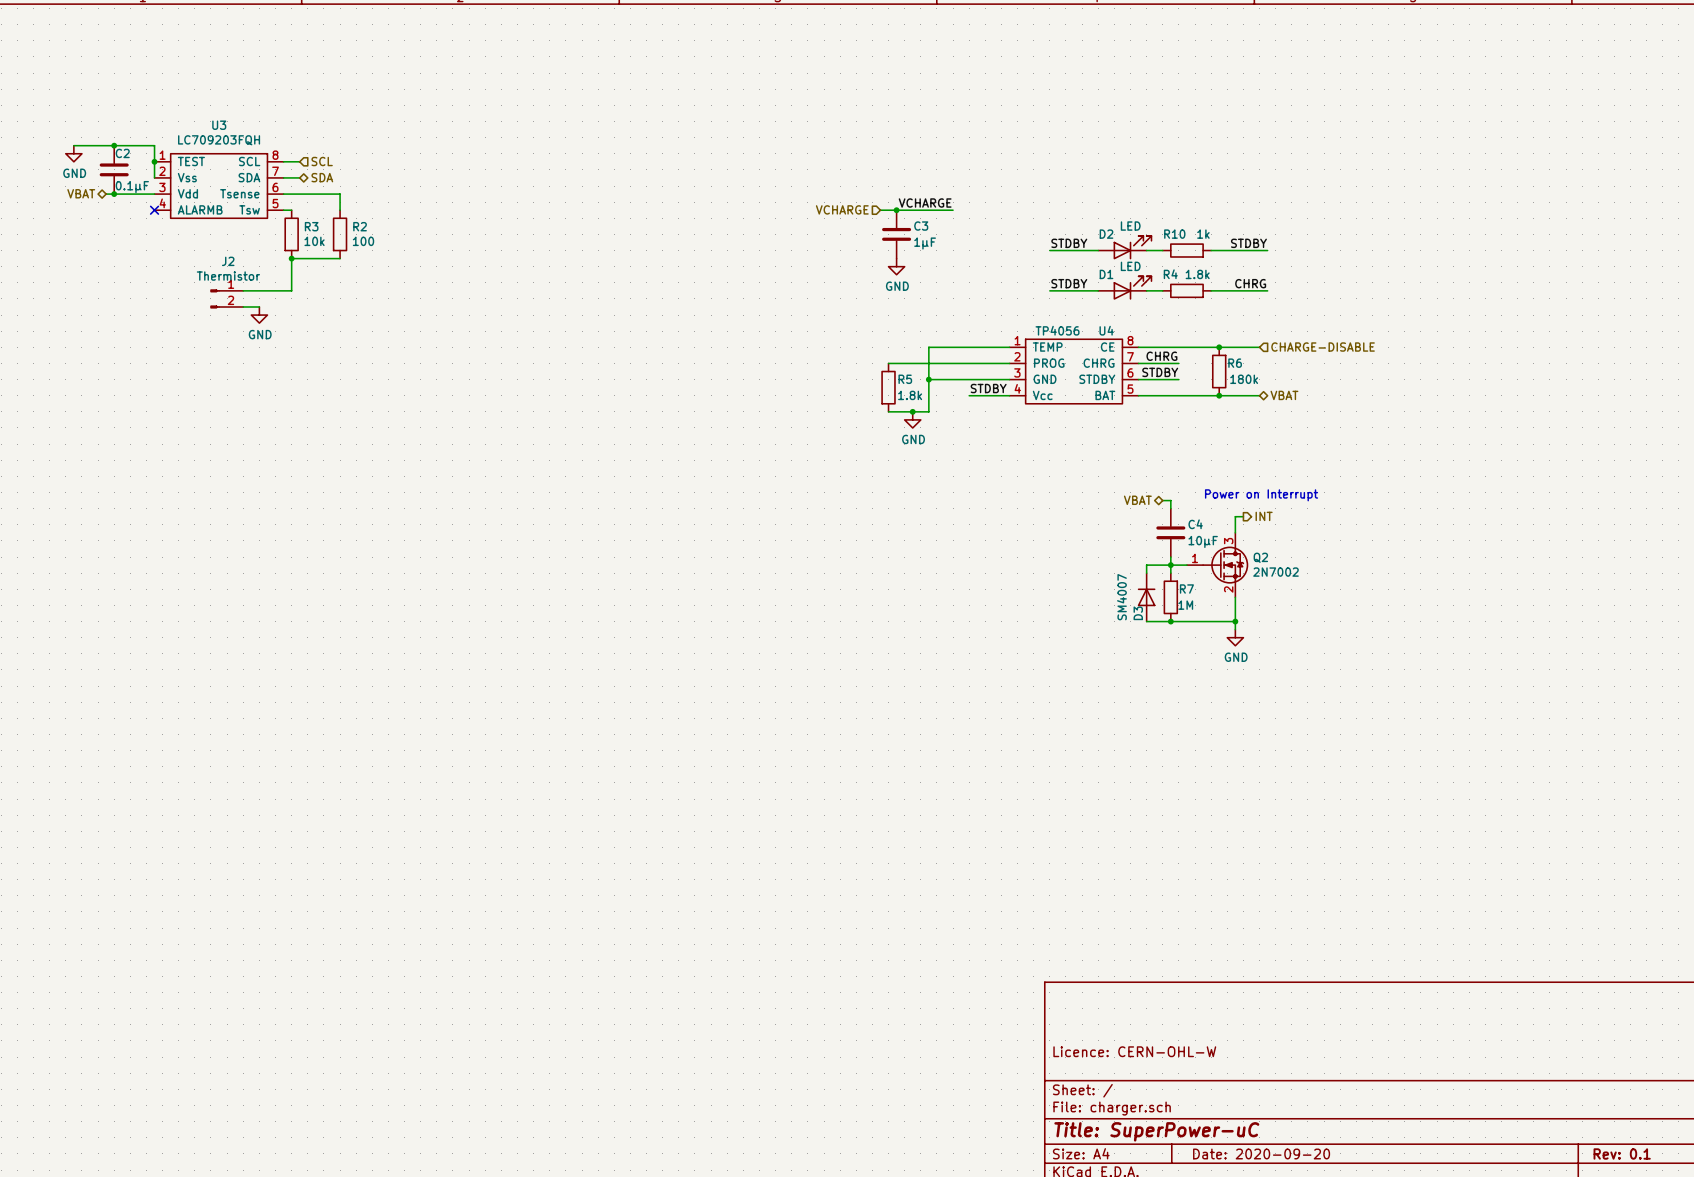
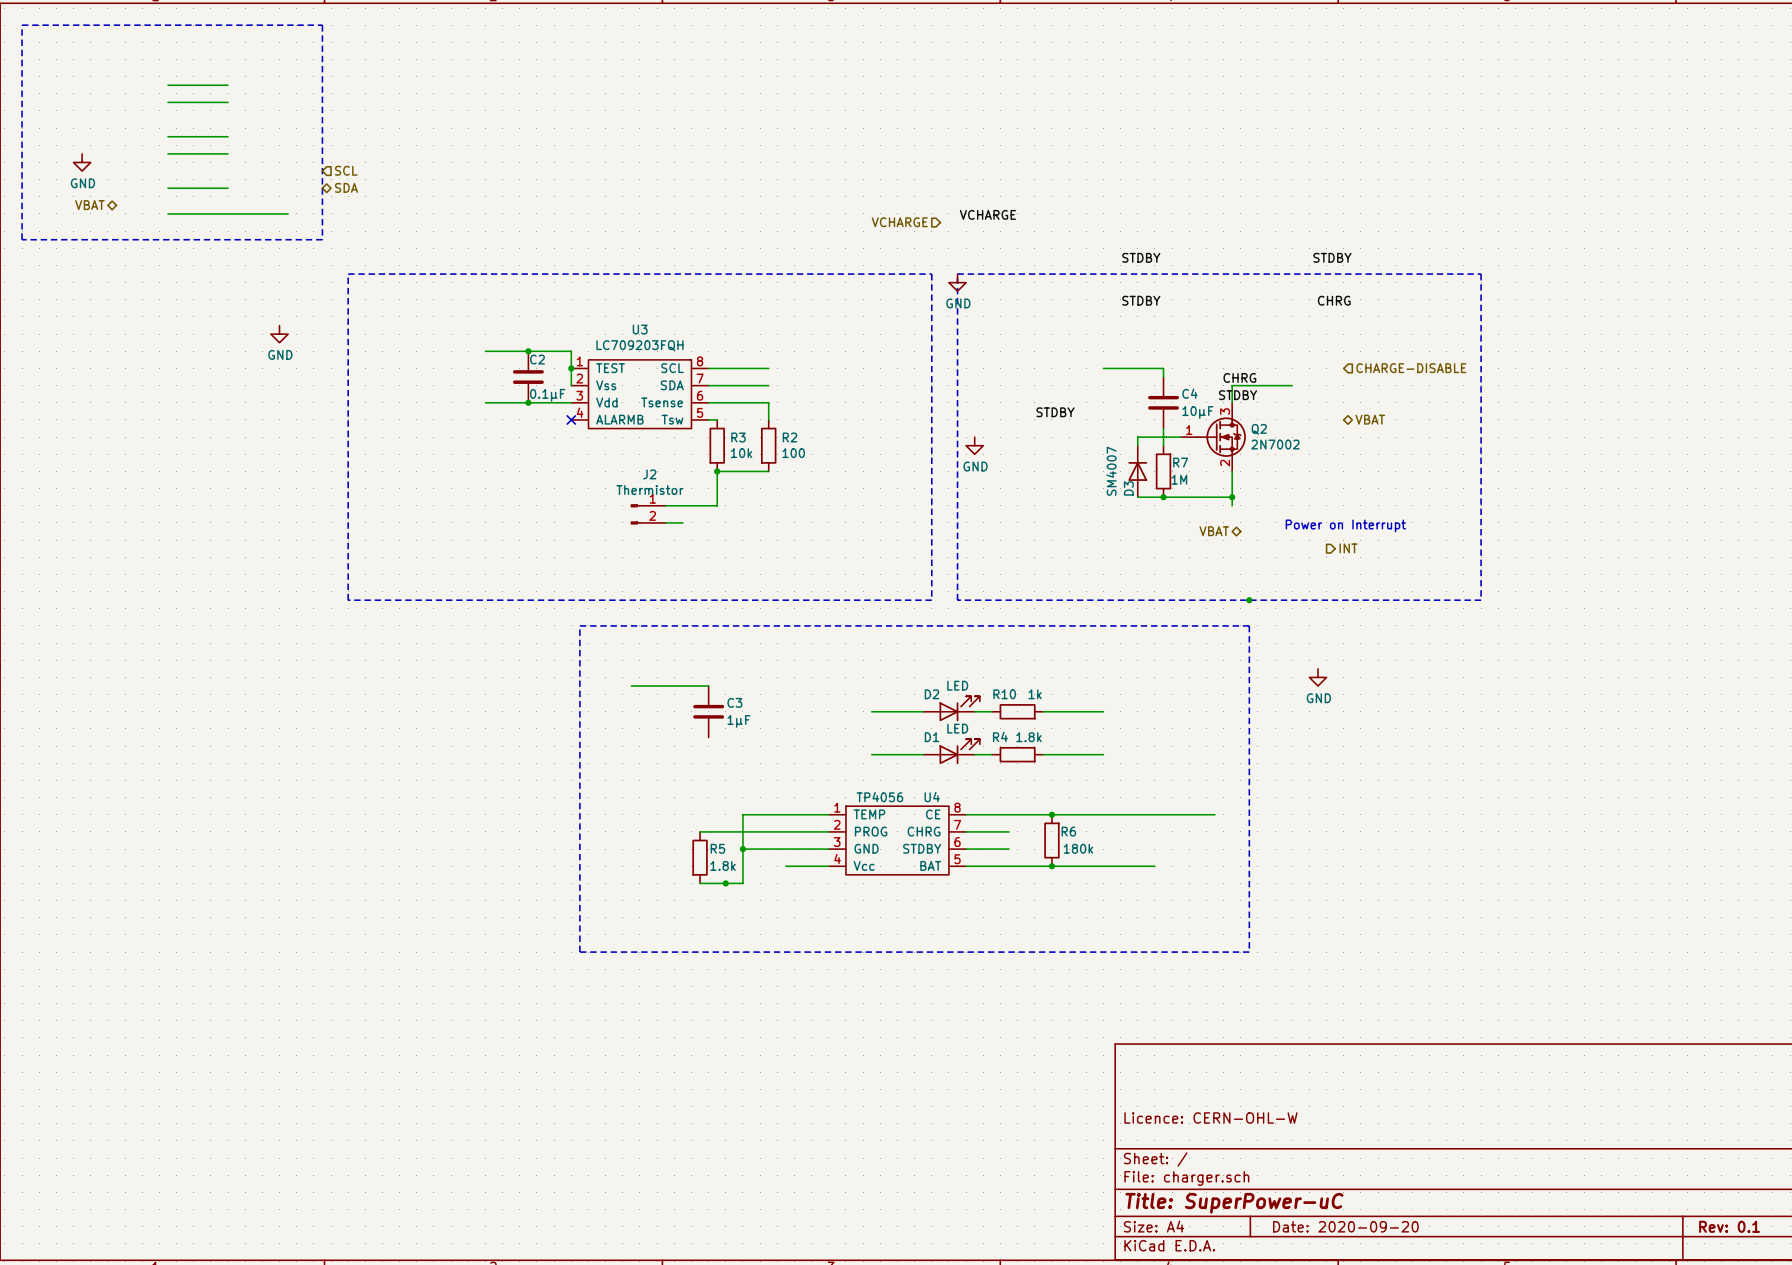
line: none -> (22, 25) (322, 25) (322, 239) (22, 239) (22, 25)
wire: none -> (167, 85) (228, 85)
wire: none -> (167, 102) (228, 102)
wire: none -> (167, 136) (228, 136)
wire: (73, 145) (154, 145) (154, 177) -> (228, 188) (167, 188)
junction: (114, 145) -> none
wire: none -> (167, 153) (228, 153)
junction: (154, 161) -> none
wire: (283, 161) (299, 161) -> none
C2 position: (114, 169) -> (528, 377)
wire: (283, 177) (299, 177) -> none
U3 position: (219, 186) -> (639, 394)
wire: (106, 194) (154, 194) -> none
junction: (114, 194) -> none
wire: (283, 194) (340, 194) (340, 210) -> none
wire: none -> (167, 213) (288, 213)
no-connect mark: (154, 210) -> none
wire: (283, 210) (291, 210) -> none
wire: (880, 210) (953, 210) -> none
junction: (896, 210) -> none
R3 position: (291, 234) -> (717, 445)
R2 position: (340, 234) -> (768, 445)
C3 position: (896, 234) -> (708, 711)
D2 position: (1124, 247) -> (951, 708)
wire: (1049, 250) (1098, 250) -> none
wire: (1146, 250) (1162, 250) -> none
R10 position: (1186, 250) -> (1017, 711)
wire: (1211, 250) (1267, 250) -> none
junction: (291, 258) -> none
line: none -> (348, 274) (931, 274) (931, 600) (348, 600) (348, 274)
wire: (340, 258) (291, 258) (291, 290) (243, 290) -> none
line: none -> (957, 274) (1481, 274) (1481, 600) (957, 600) (957, 274)
D1 position: (1124, 288) -> (951, 751)
wire: (1049, 290) (1098, 290) -> none
wire: (1146, 290) (1162, 290) -> none
R4 position: (1186, 290) -> (1017, 754)
wire: (1211, 290) (1267, 290) -> none
J2 position: (226, 298) -> (648, 514)
wire: (243, 307) (259, 307) -> none
wire: none -> (485, 351) (571, 351) (571, 385)
junction: none -> (528, 351)
junction: none -> (571, 368)
wire: none -> (708, 368) (768, 368)
wire: (1009, 347) (928, 347) (928, 411) (888, 411) -> none
wire: none -> (1103, 368) (1163, 368) (1163, 377)
wire: (1138, 347) (1259, 347) -> none
junction: (1219, 347) -> none
wire: none -> (708, 385) (768, 385)
wire: (888, 363) (1009, 363) -> none
wire: (1138, 363) (1154, 363) -> (1232, 402) (1232, 385)
wire: none -> (1257, 385) (1292, 385)
U4 position: (1074, 371) -> (897, 840)
R6 position: (1219, 371) -> (1051, 840)
wire: none -> (485, 402) (571, 402)
junction: none -> (528, 402)
wire: none -> (708, 402) (768, 402) (768, 419)
wire: (928, 379) (1009, 379) -> none
junction: (928, 379) -> none
wire: (1138, 379) (1178, 379) -> none
R5 position: (888, 387) -> (700, 857)
no-connect mark: none -> (571, 419)
wire: none -> (708, 419) (717, 419)
wire: (969, 395) (1009, 395) -> none
wire: (1138, 395) (1259, 395) -> none
junction: (1219, 395) -> none
wire: none -> (1163, 428) (1163, 445)
junction: (912, 411) -> none
wire: none -> (1180, 437) (1137, 437) (1137, 445)
junction: none -> (717, 471)
wire: none -> (768, 471) (717, 471) (717, 505) (665, 505)
wire: none -> (1232, 471) (1232, 505)
wire: none -> (1137, 497) (1232, 497)
junction: none -> (1163, 497)
junction: none -> (1232, 497)
wire: none -> (665, 522) (682, 522)
wire: (1162, 500) (1170, 500) (1170, 508) -> none
wire: (1243, 516) (1235, 516) (1235, 532) -> none
C4 position: (1170, 532) -> (1163, 402)
wire: (1170, 557) (1170, 573) -> none
Q2 position: (1217, 565) -> (1213, 437)
line: none -> (579, 625) (579, 952) (1249, 952) (1249, 625) (579, 625)
D3 position: (1146, 597) -> (1137, 471)
R7 position: (1170, 597) -> (1163, 471)
wire: (1235, 597) (1235, 629) -> none
wire: (1146, 621) (1235, 621) -> none
junction: (1170, 621) -> none
junction: (1235, 621) -> none
wire: none -> (631, 686) (708, 686)
wire: none -> (871, 711) (923, 711)
wire: none -> (974, 711) (991, 711)
wire: none -> (1043, 711) (1103, 711)
wire: none -> (871, 754) (923, 754)
wire: none -> (974, 754) (991, 754)
wire: none -> (1043, 754) (1103, 754)
wire: none -> (828, 814) (742, 814) (742, 883) (700, 883)
wire: none -> (966, 814) (1215, 814)
junction: none -> (1051, 814)
wire: none -> (700, 831) (828, 831)
wire: none -> (966, 831) (1009, 831)
wire: none -> (742, 849) (828, 849)
junction: none -> (742, 849)
wire: none -> (966, 849) (1009, 849)
wire: none -> (785, 866) (828, 866)
wire: none -> (966, 866) (1154, 866)
junction: none -> (1051, 866)
junction: none -> (725, 883)

